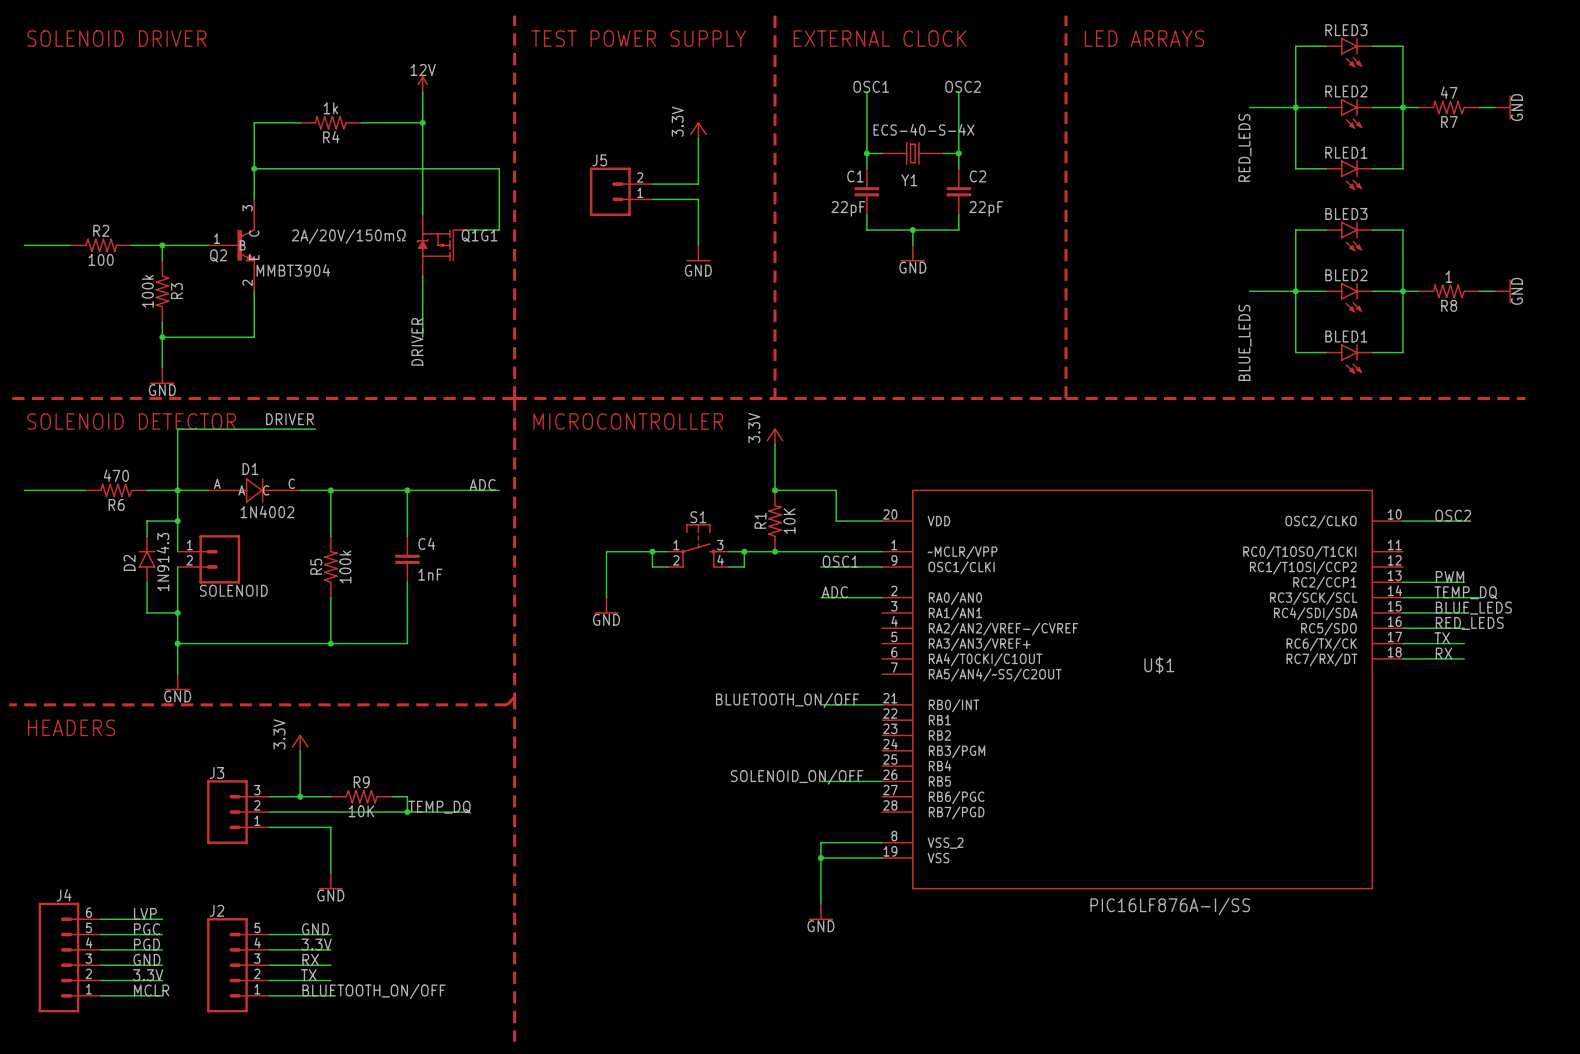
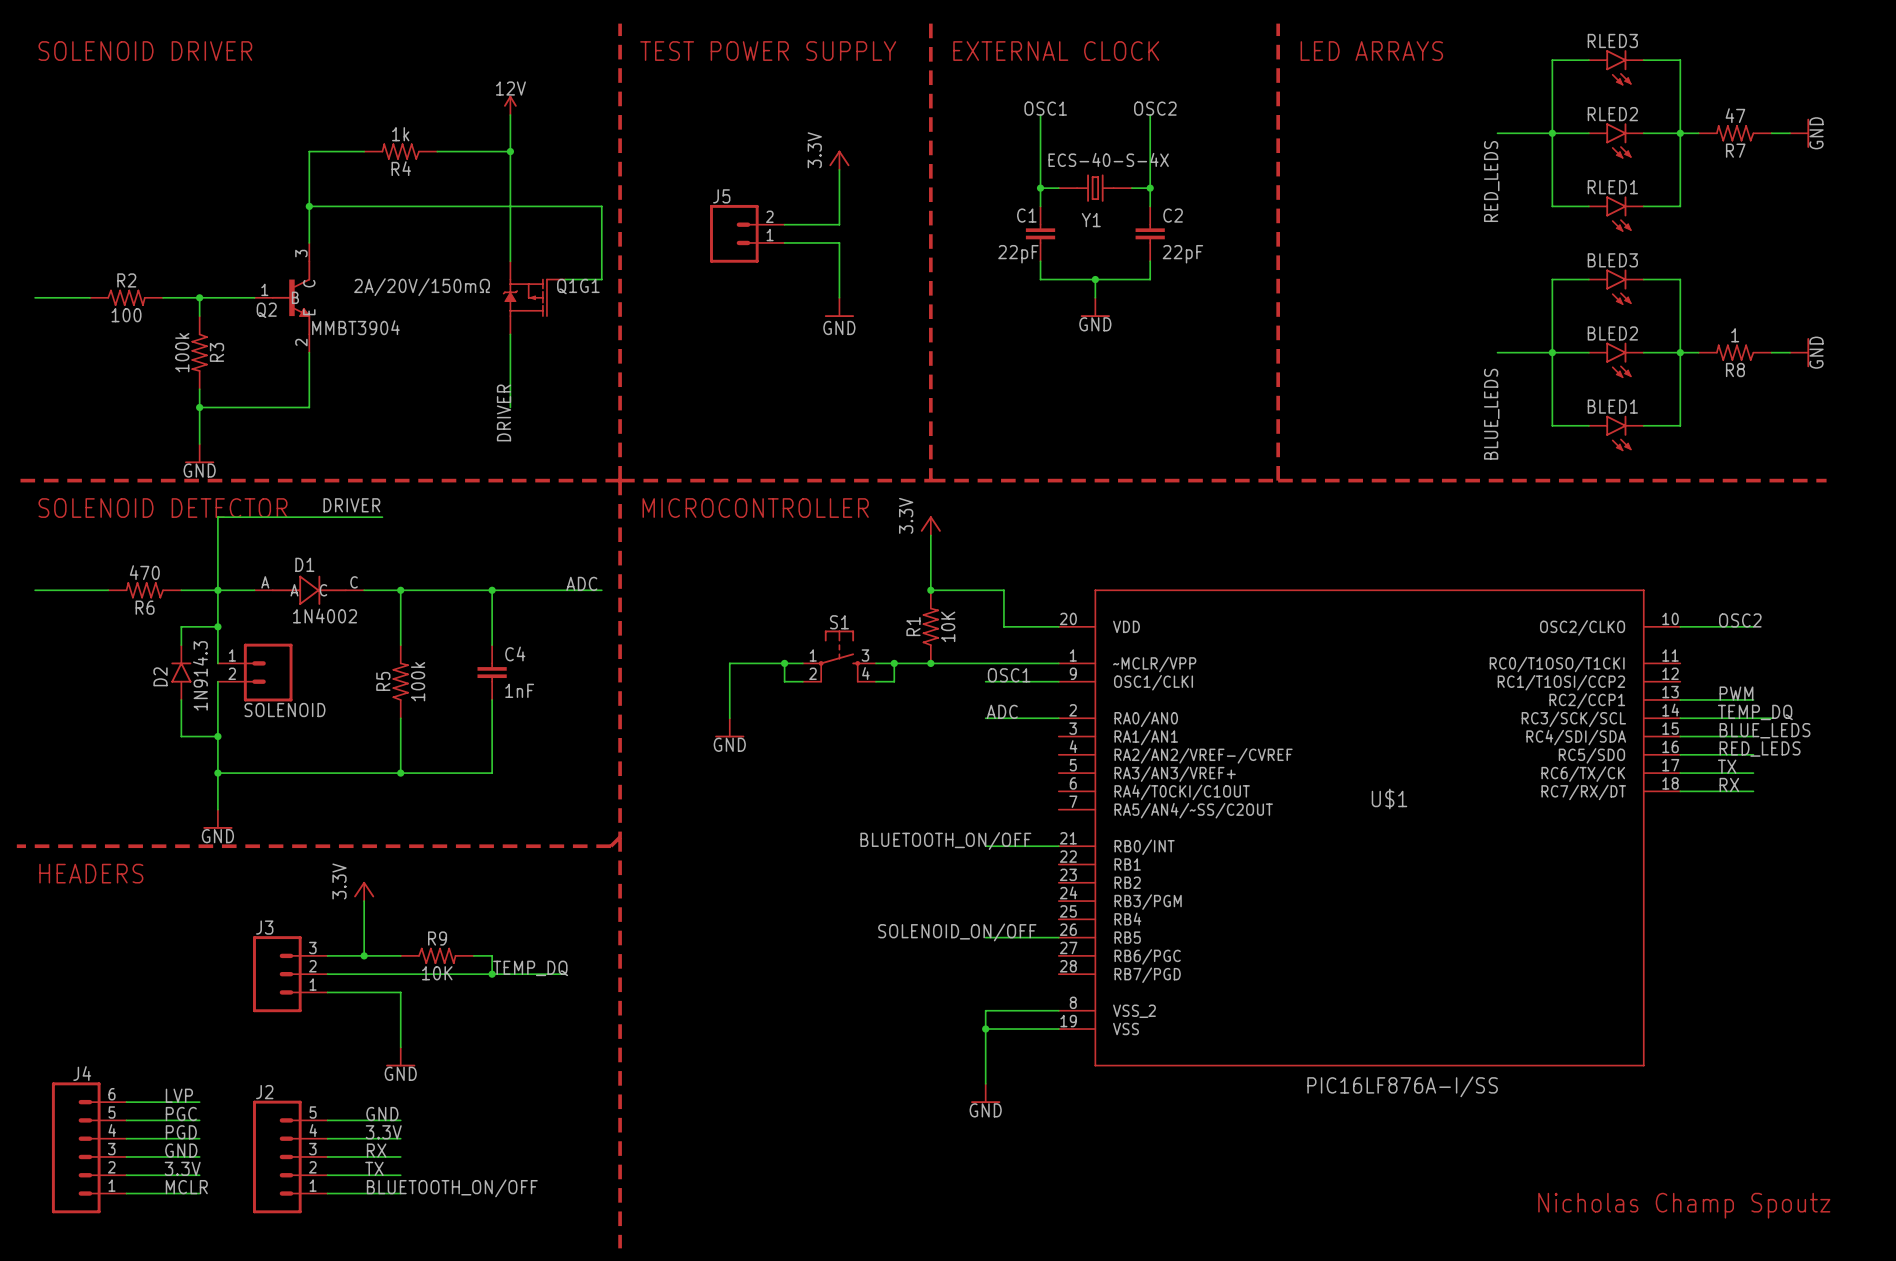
text: none -> Nicholas Champ Spoutz (1684, 1205)

